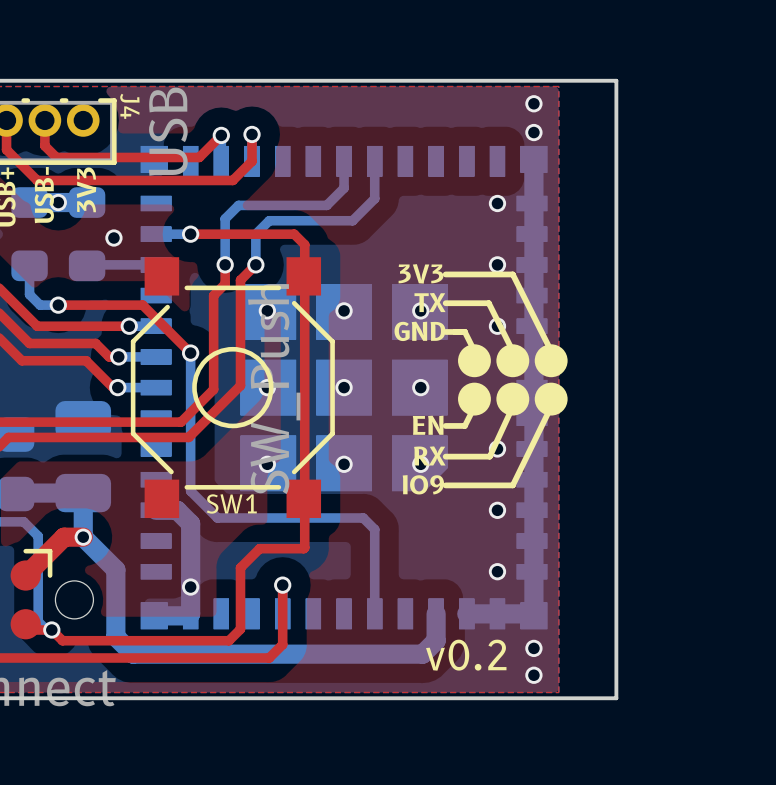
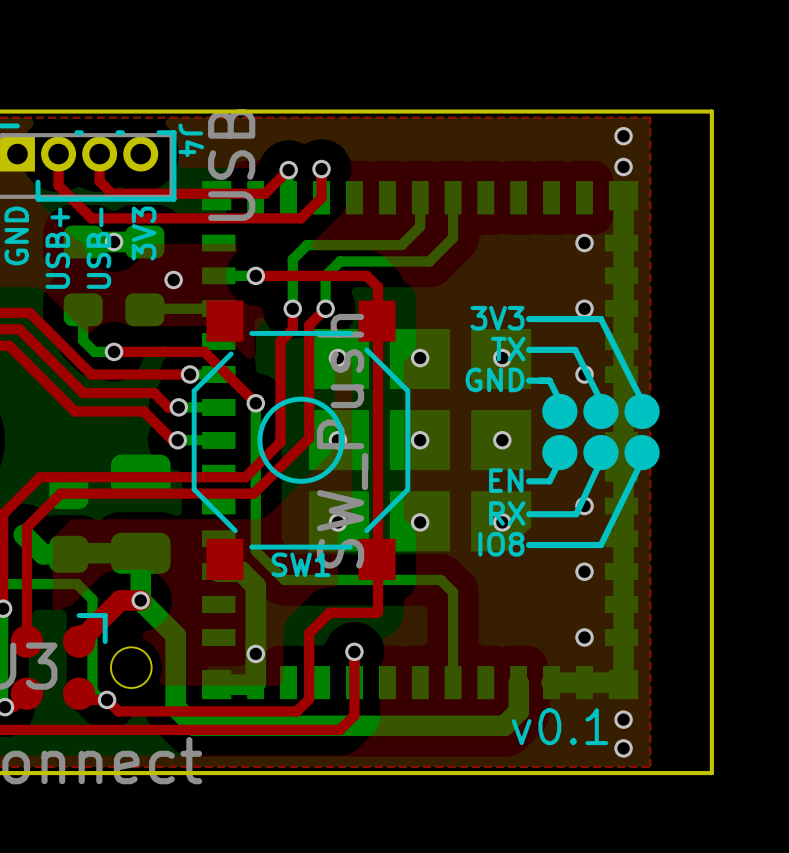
text: IO9 (423, 484) -> IO8 (501, 544)
text: v0.2 (466, 655) -> v0.1 (560, 726)

